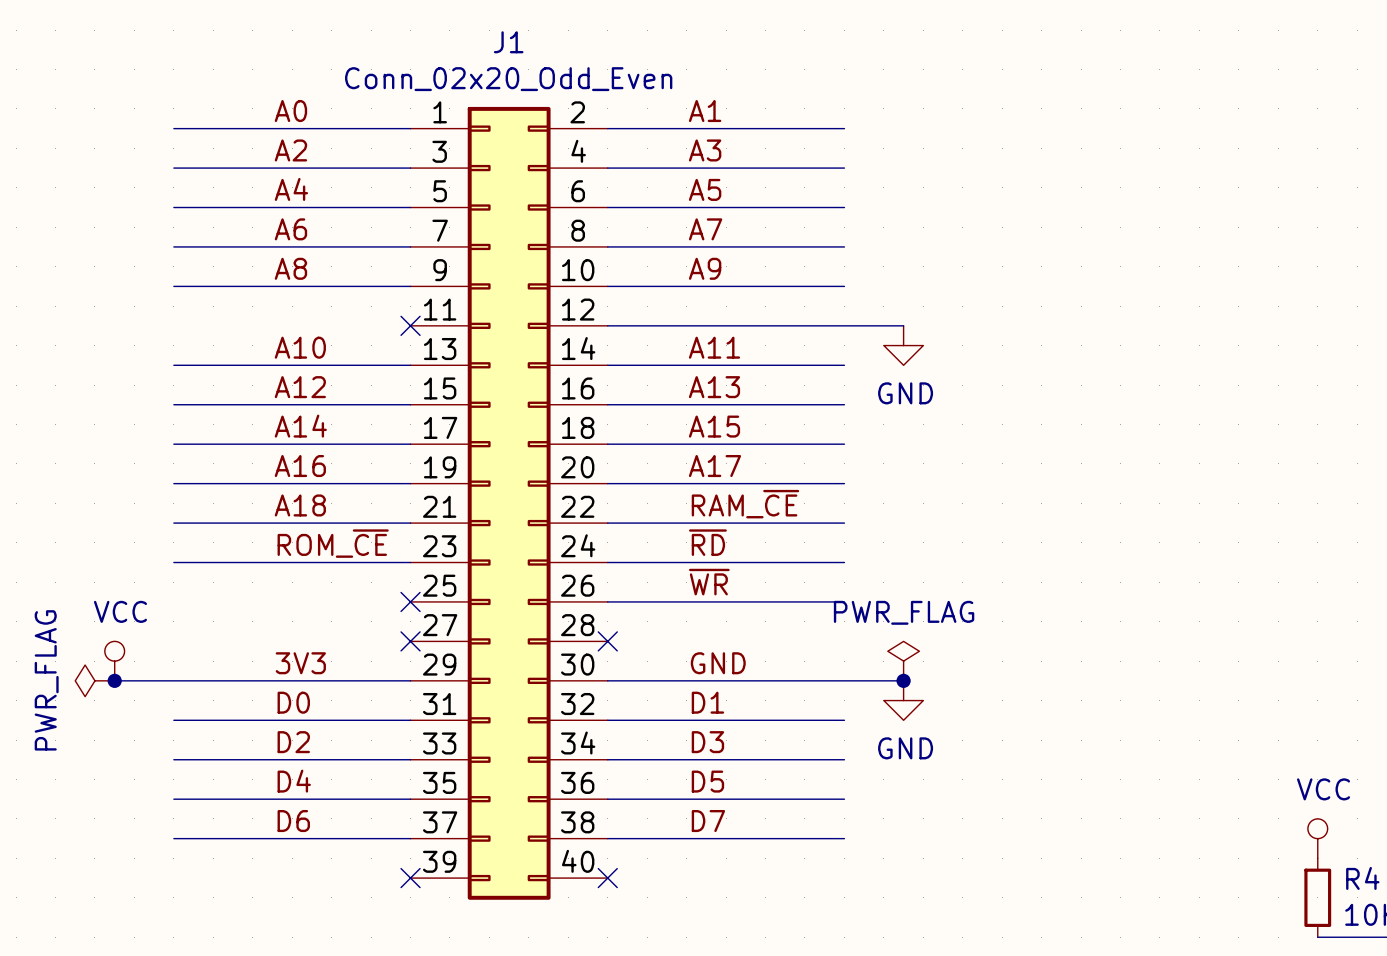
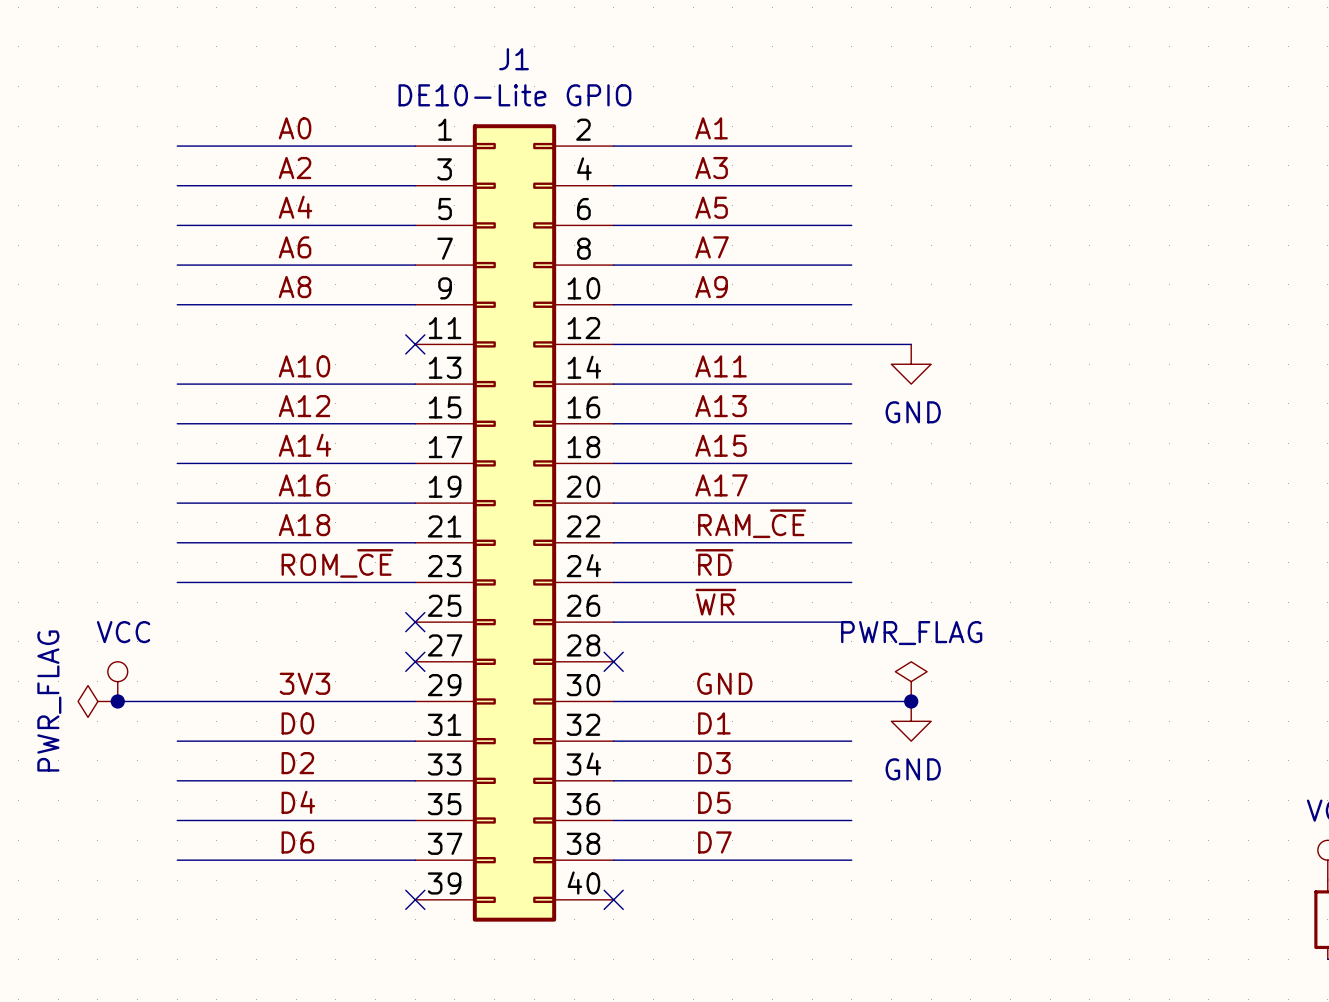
J1 value: Conn_02x20_Odd_Even (508, 79) -> DE10-Lite GPIO (514, 95)

